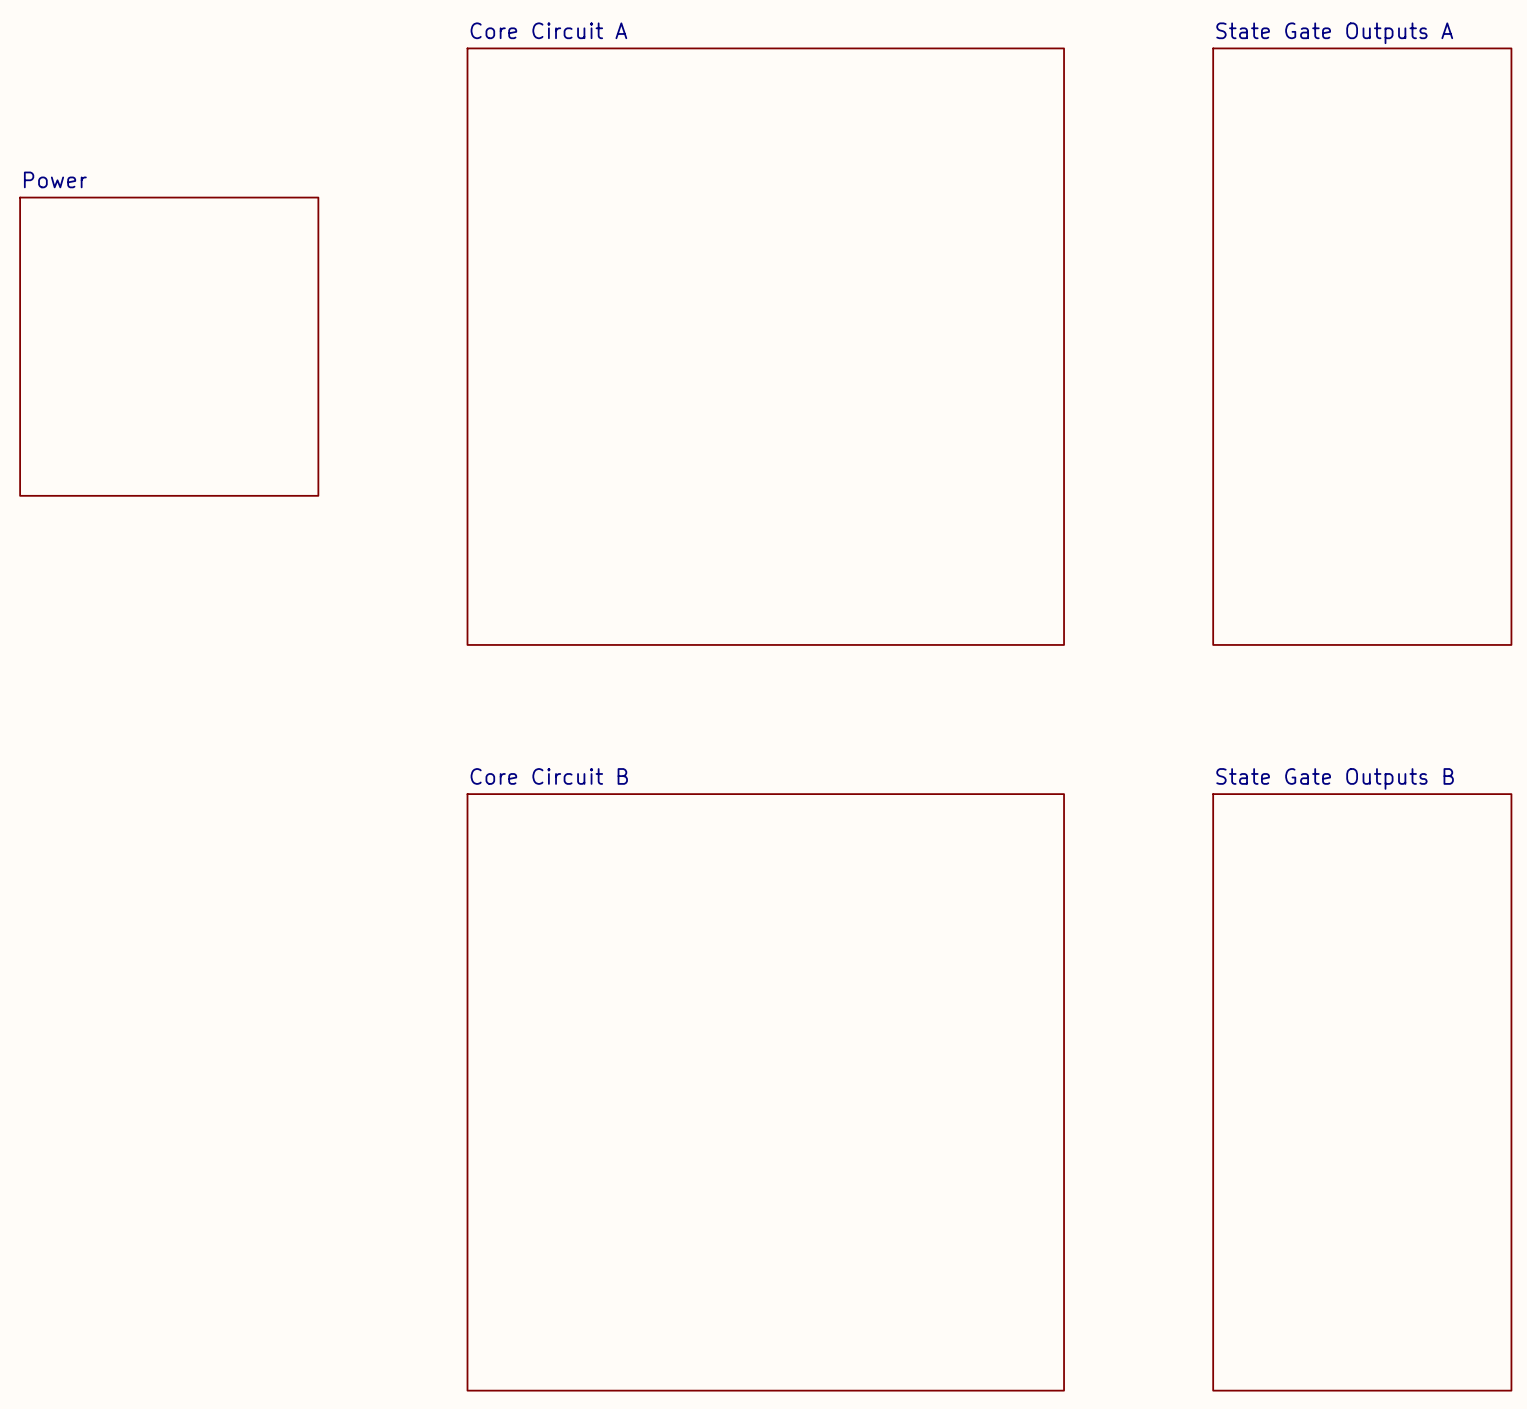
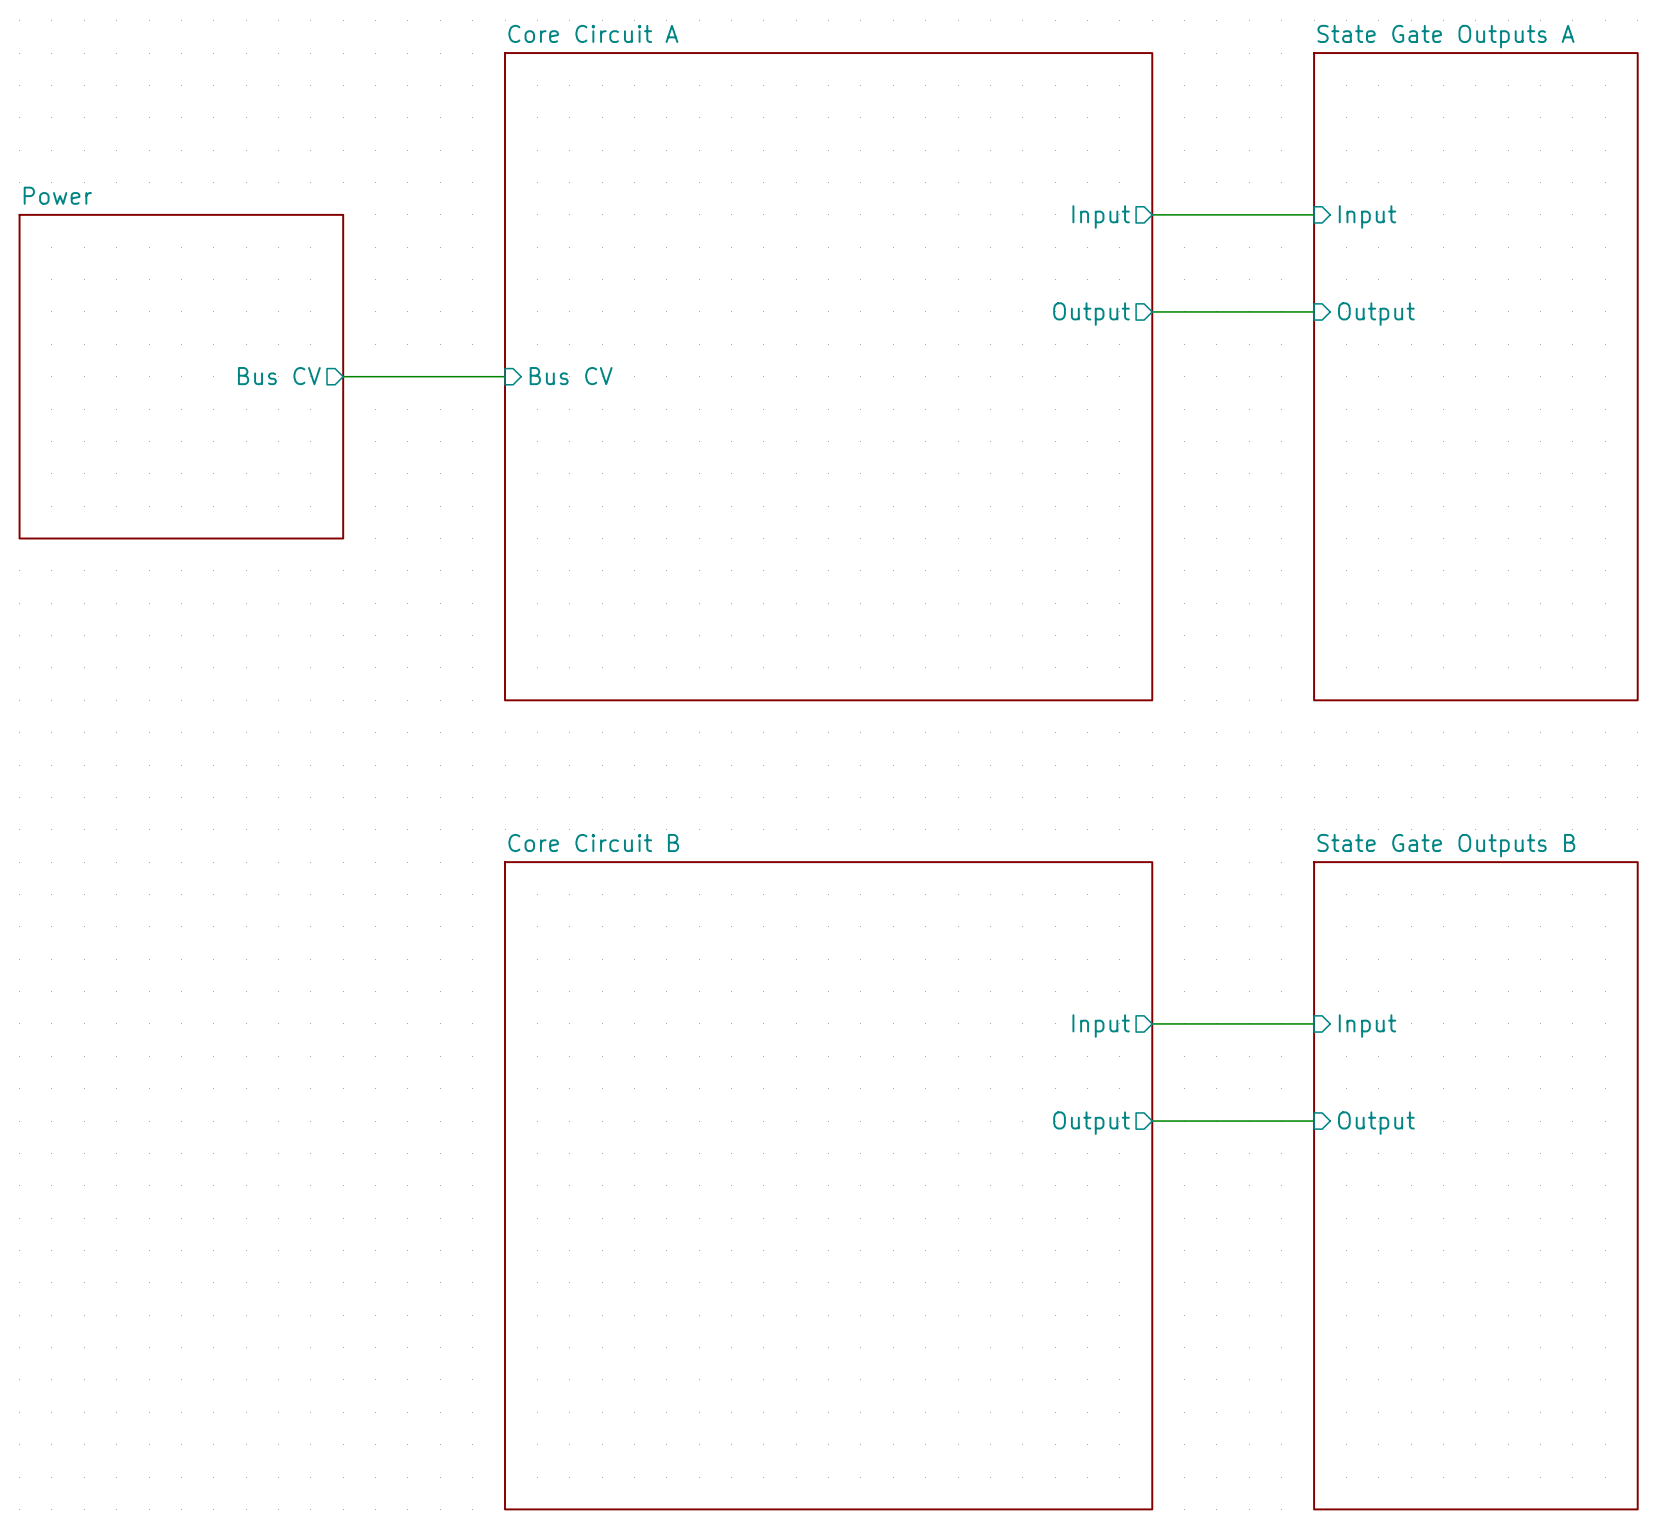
wire: none -> (1152, 214) (1314, 214)
sheet pin: none -> Input (1101, 216)
sheet pin: none -> Input (1367, 216)
wire: none -> (1152, 311) (1314, 311)
sheet pin: none -> Output (1091, 314)
sheet pin: none -> Output (1376, 314)
sheet pin: none -> Bus CV (279, 376)
wire: none -> (343, 376) (505, 376)
sheet pin: none -> Bus CV (571, 376)
wire: none -> (1152, 1023) (1314, 1023)
sheet pin: none -> Input (1101, 1026)
sheet pin: none -> Input (1367, 1026)
wire: none -> (1152, 1121) (1314, 1121)
sheet pin: none -> Output (1091, 1123)
sheet pin: none -> Output (1376, 1123)

